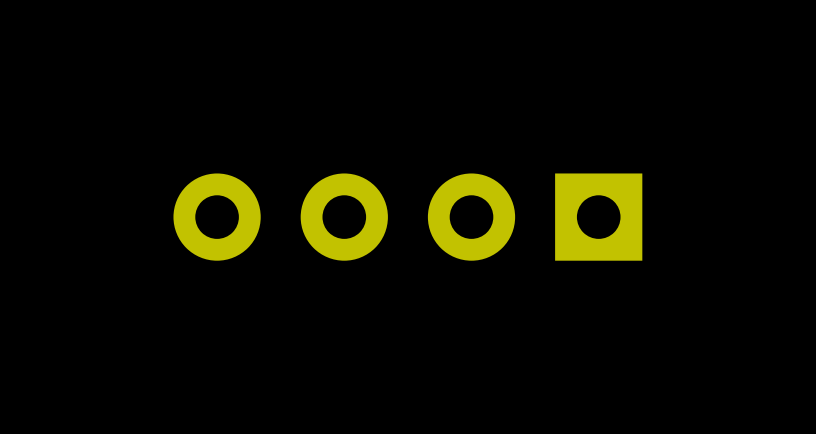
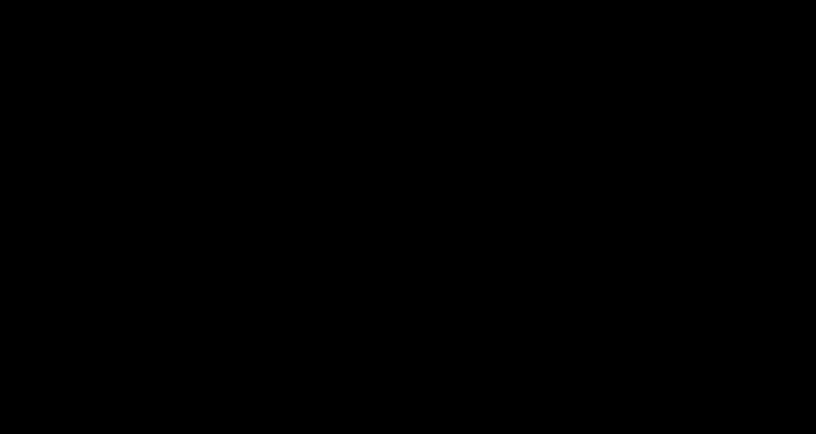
part: (407, 217) -> none

